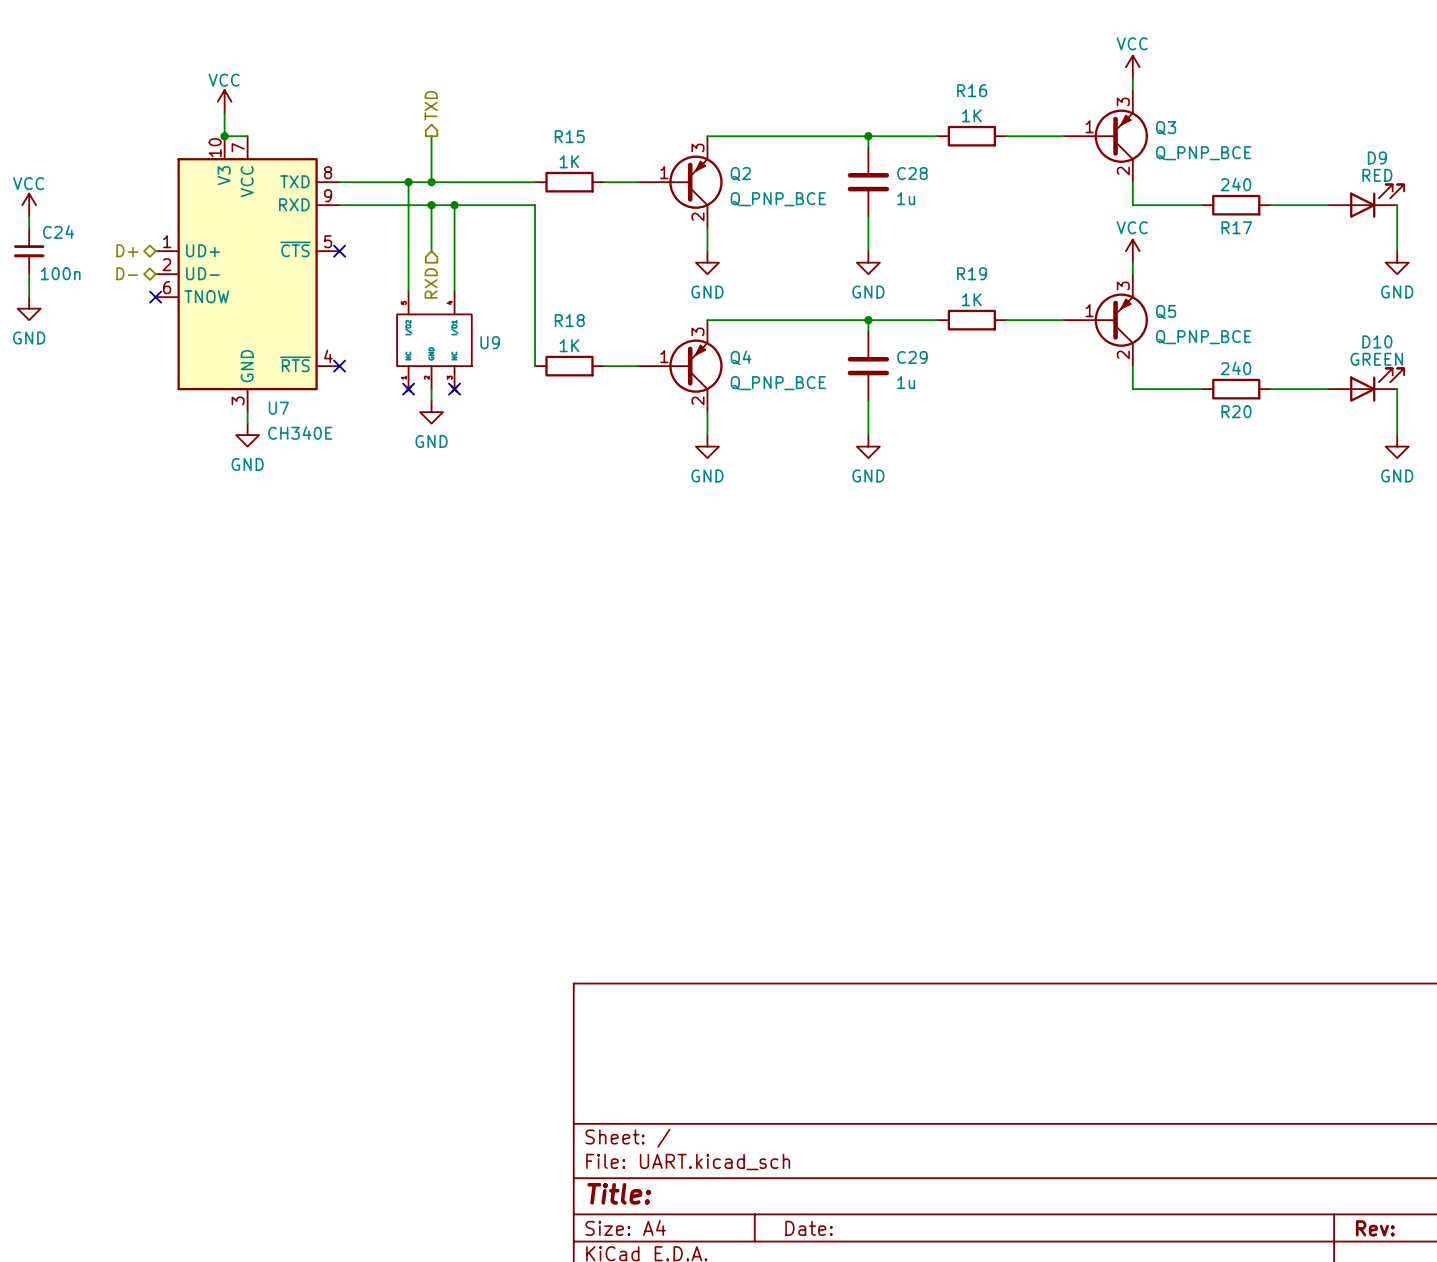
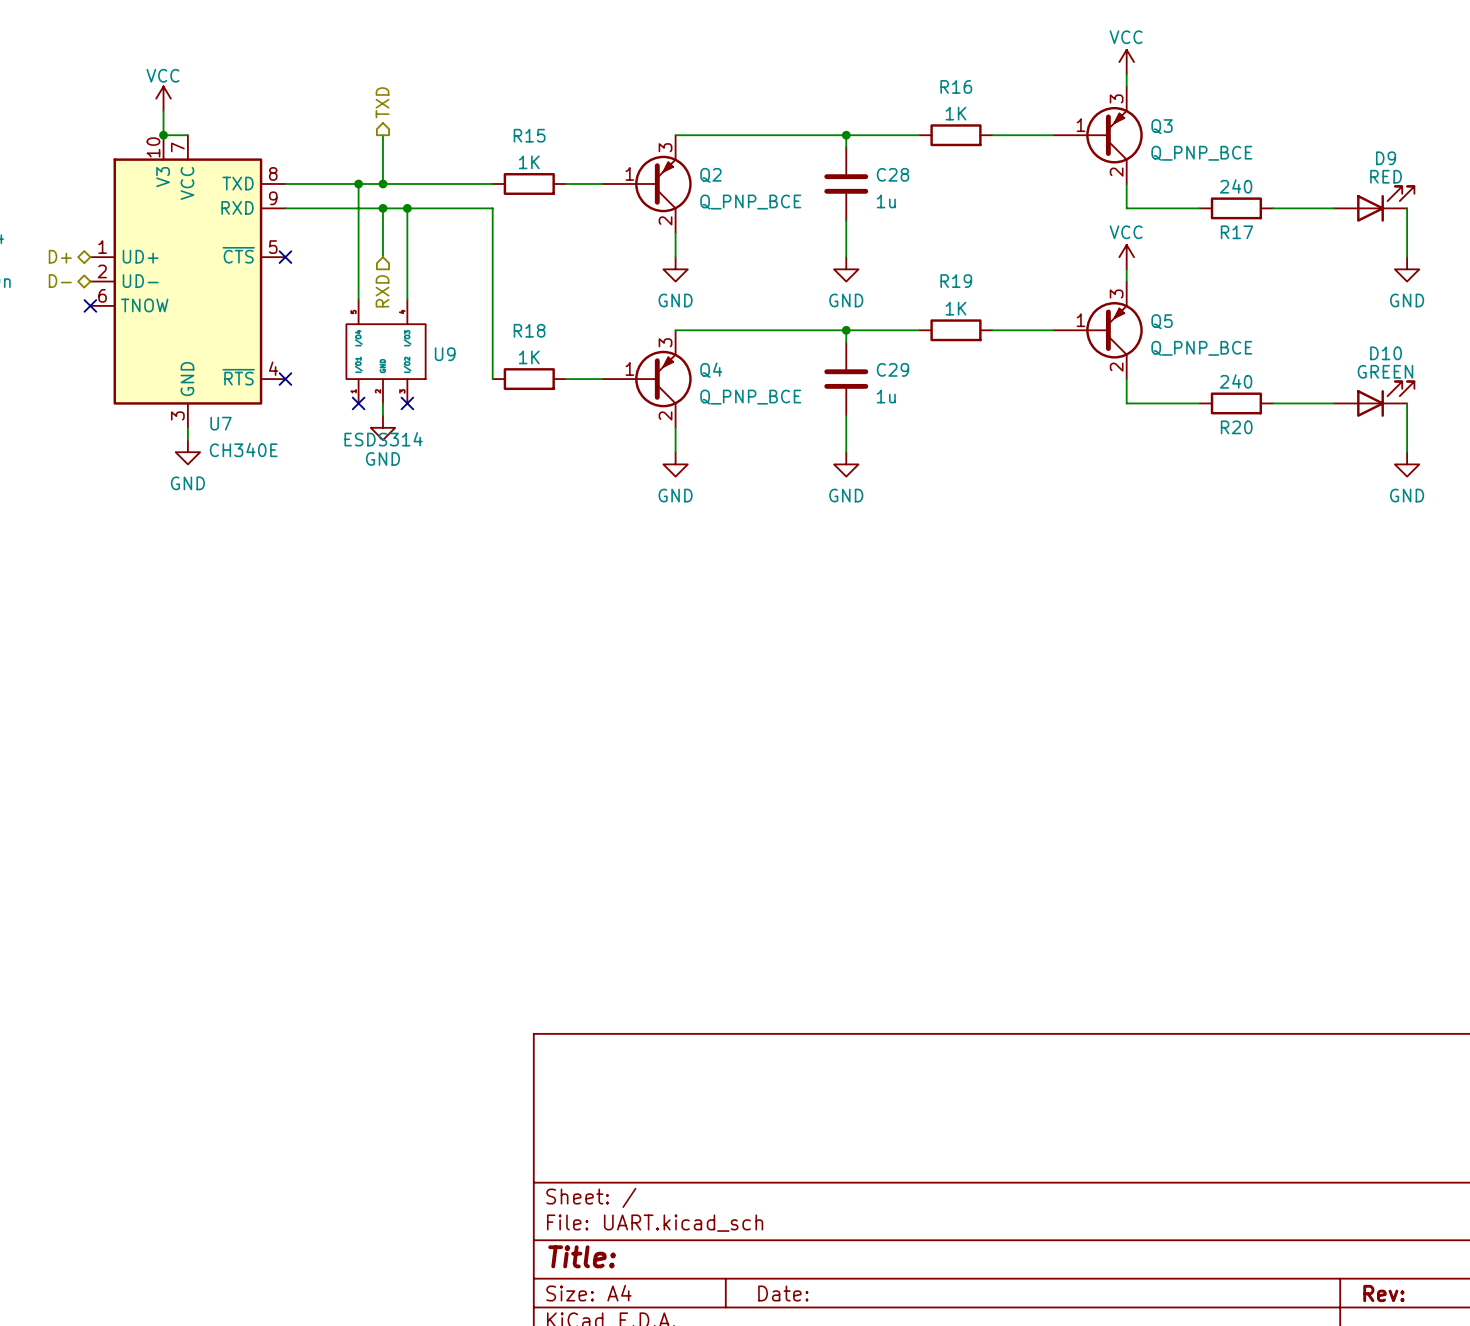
U9 symbol: [397, 291, 472, 392] -> [346, 299, 426, 404]
U9 value: none -> ESDS314 (383, 439)

